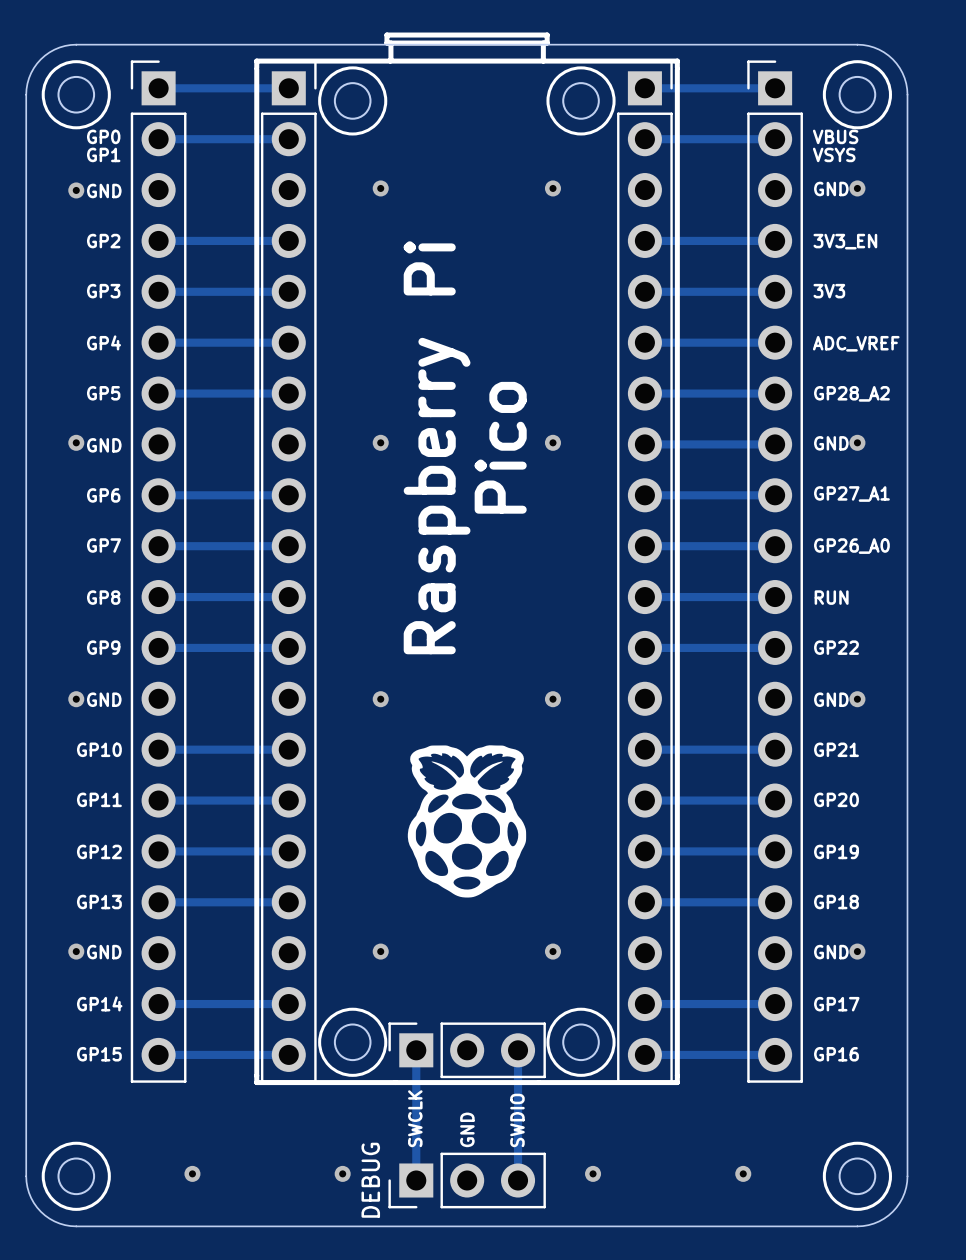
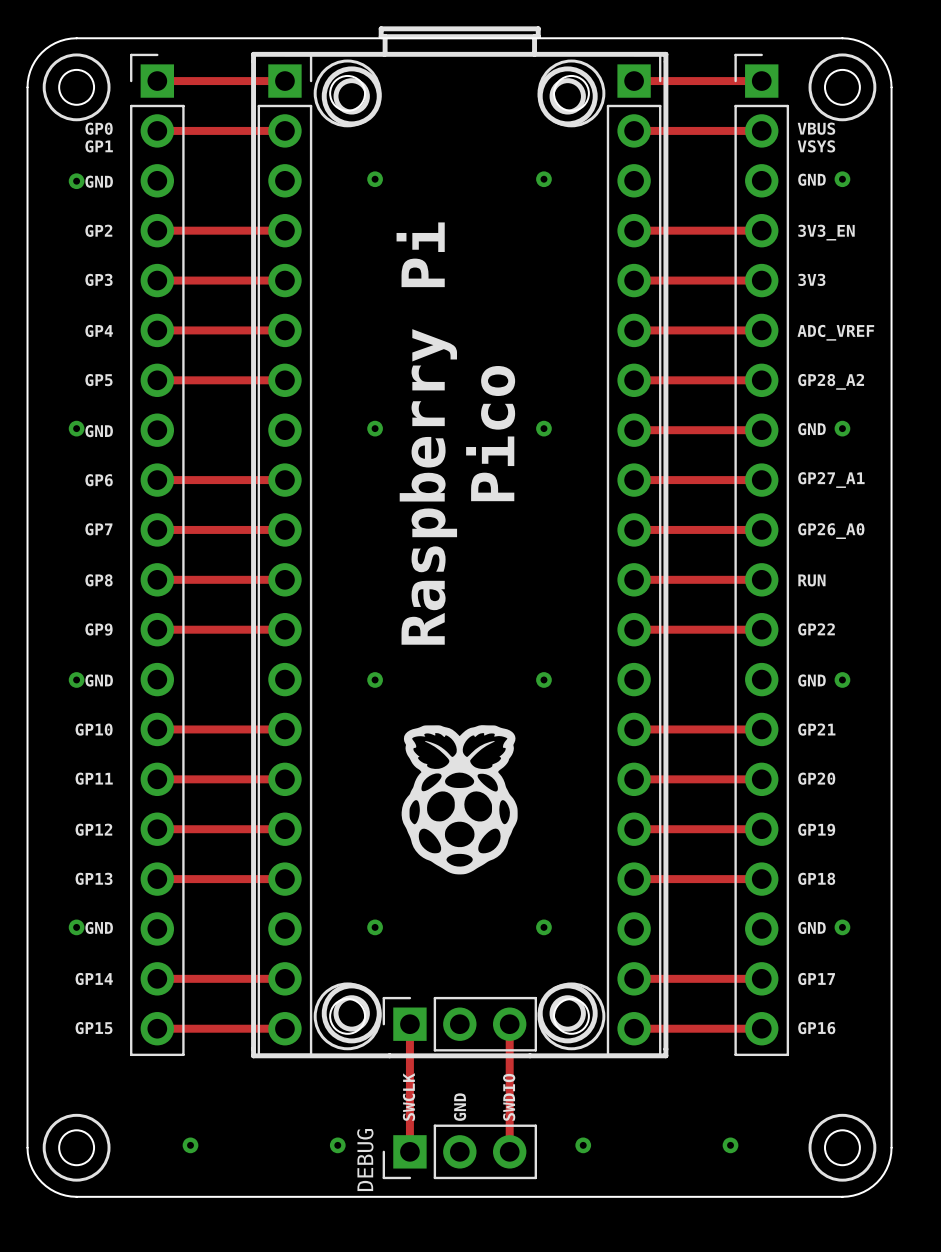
drawing shape: [254, 32, 680, 1086] -> [251, 26, 669, 1059]

